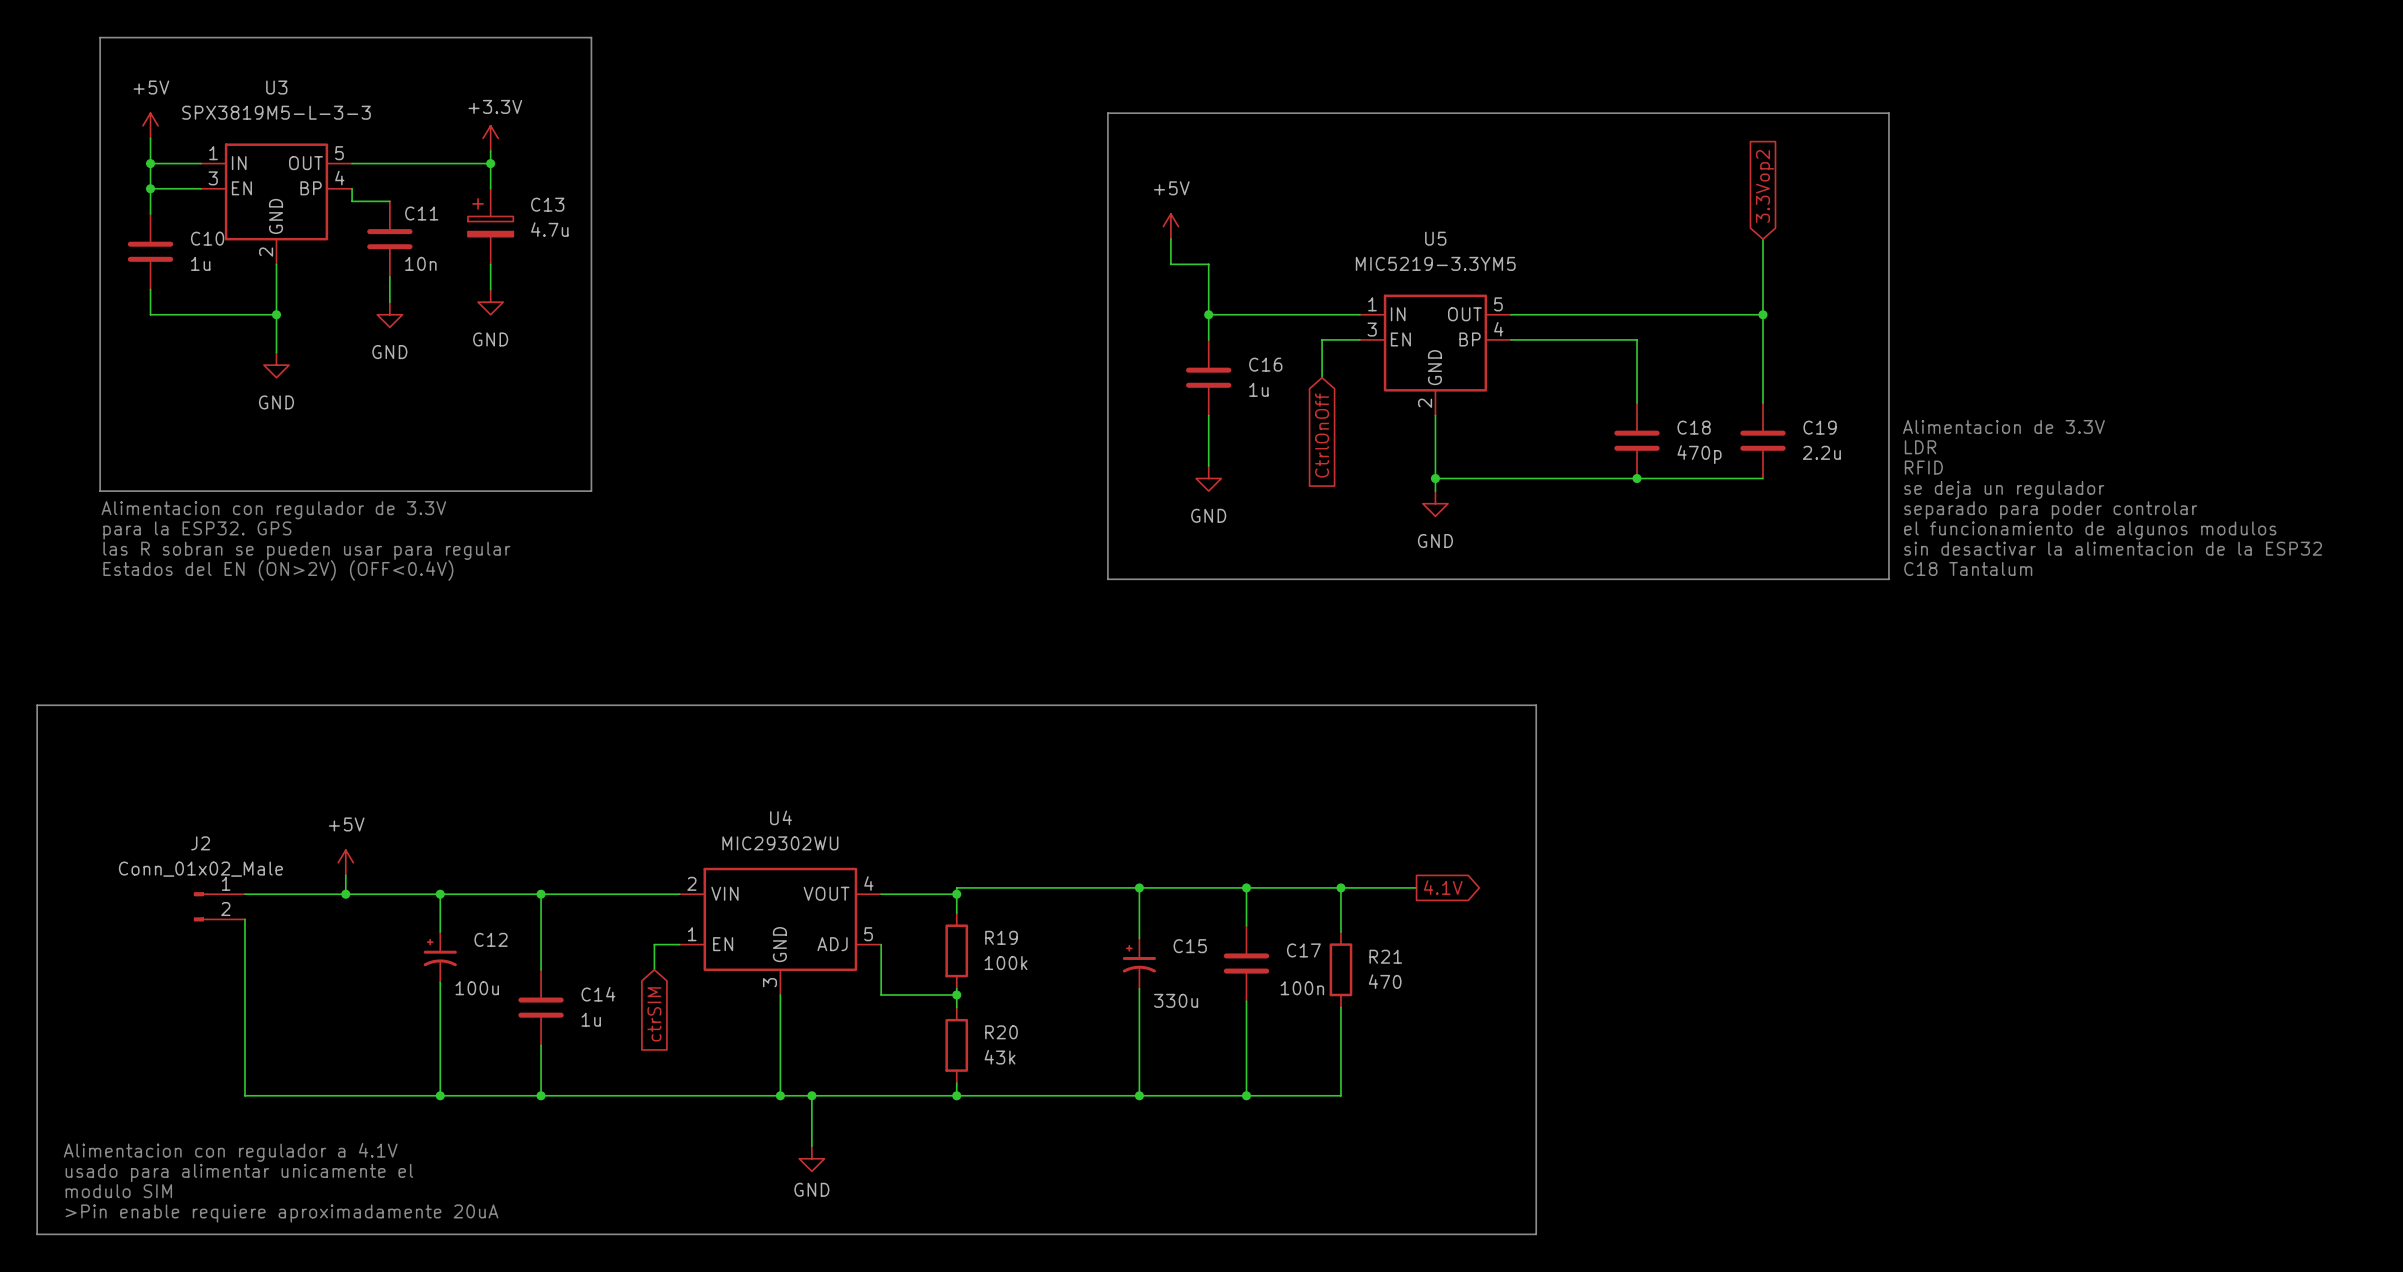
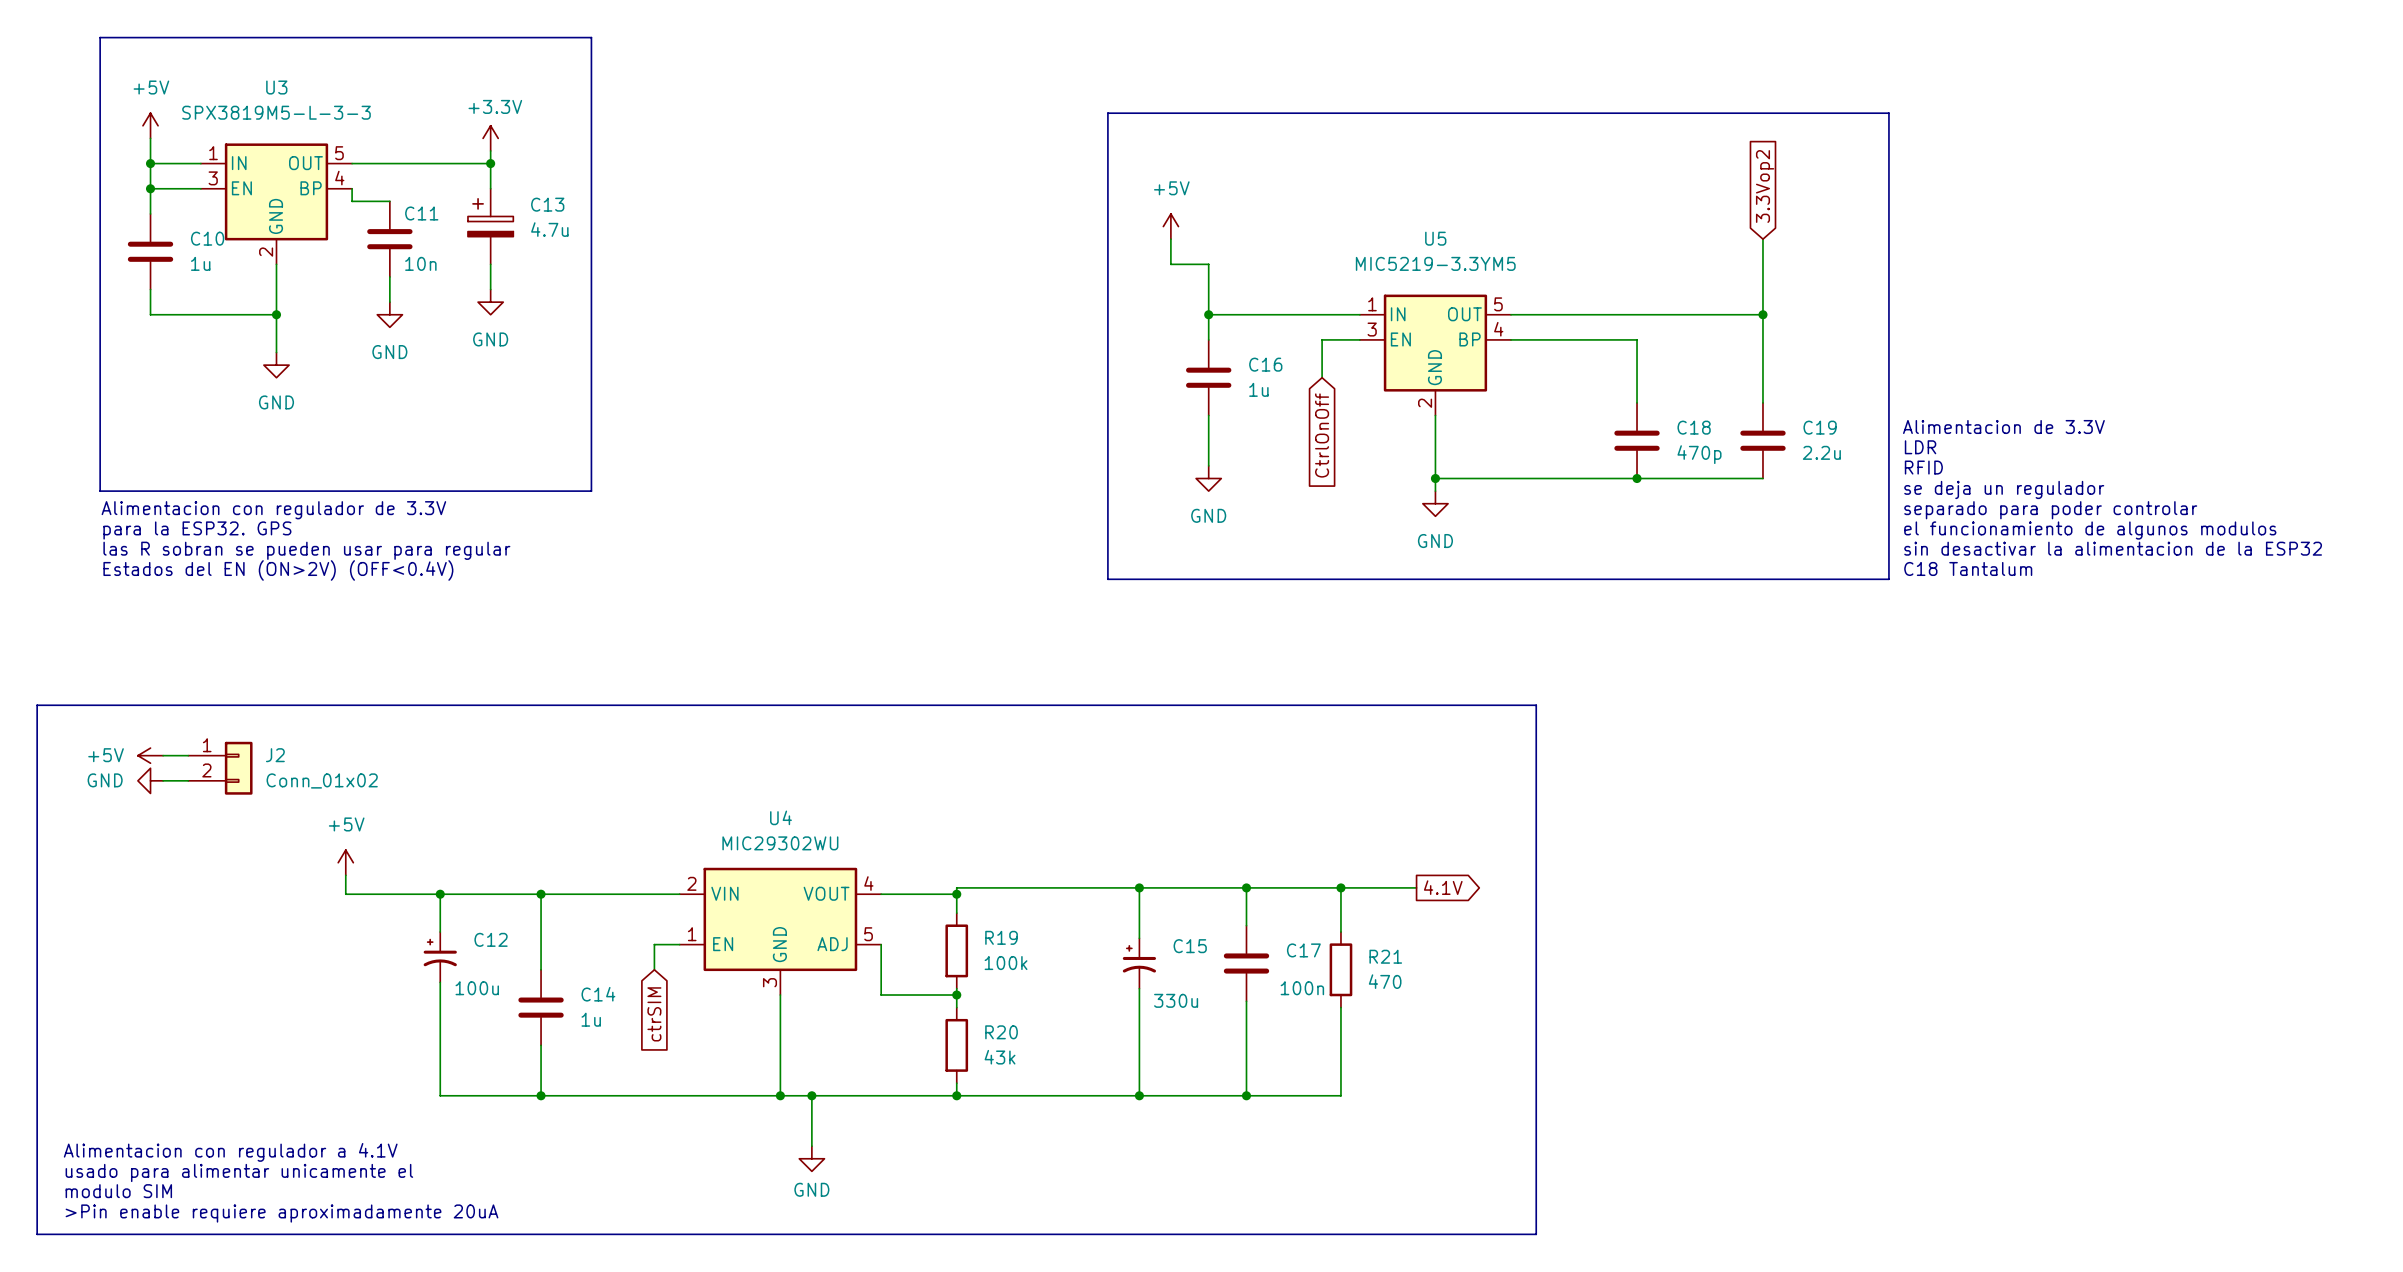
power symbol: none -> +5V (150, 755)
wire: none -> (163, 755) (188, 755)
power symbol: none -> GND (150, 780)
wire: none -> (163, 780) (188, 780)
J2 name position: J2 (200, 843) -> J2 (275, 755)
J2 value: Conn_01x02_Male (200, 869) -> Conn_01x02 (322, 780)
J2 symbol: [193, 892, 246, 922] -> [188, 741, 253, 795]
wire: (245, 894) (345, 894) -> none
junction: (345, 894) -> none
wire: (245, 919) (245, 1095) (440, 1095) -> none
junction: (440, 1095) -> none

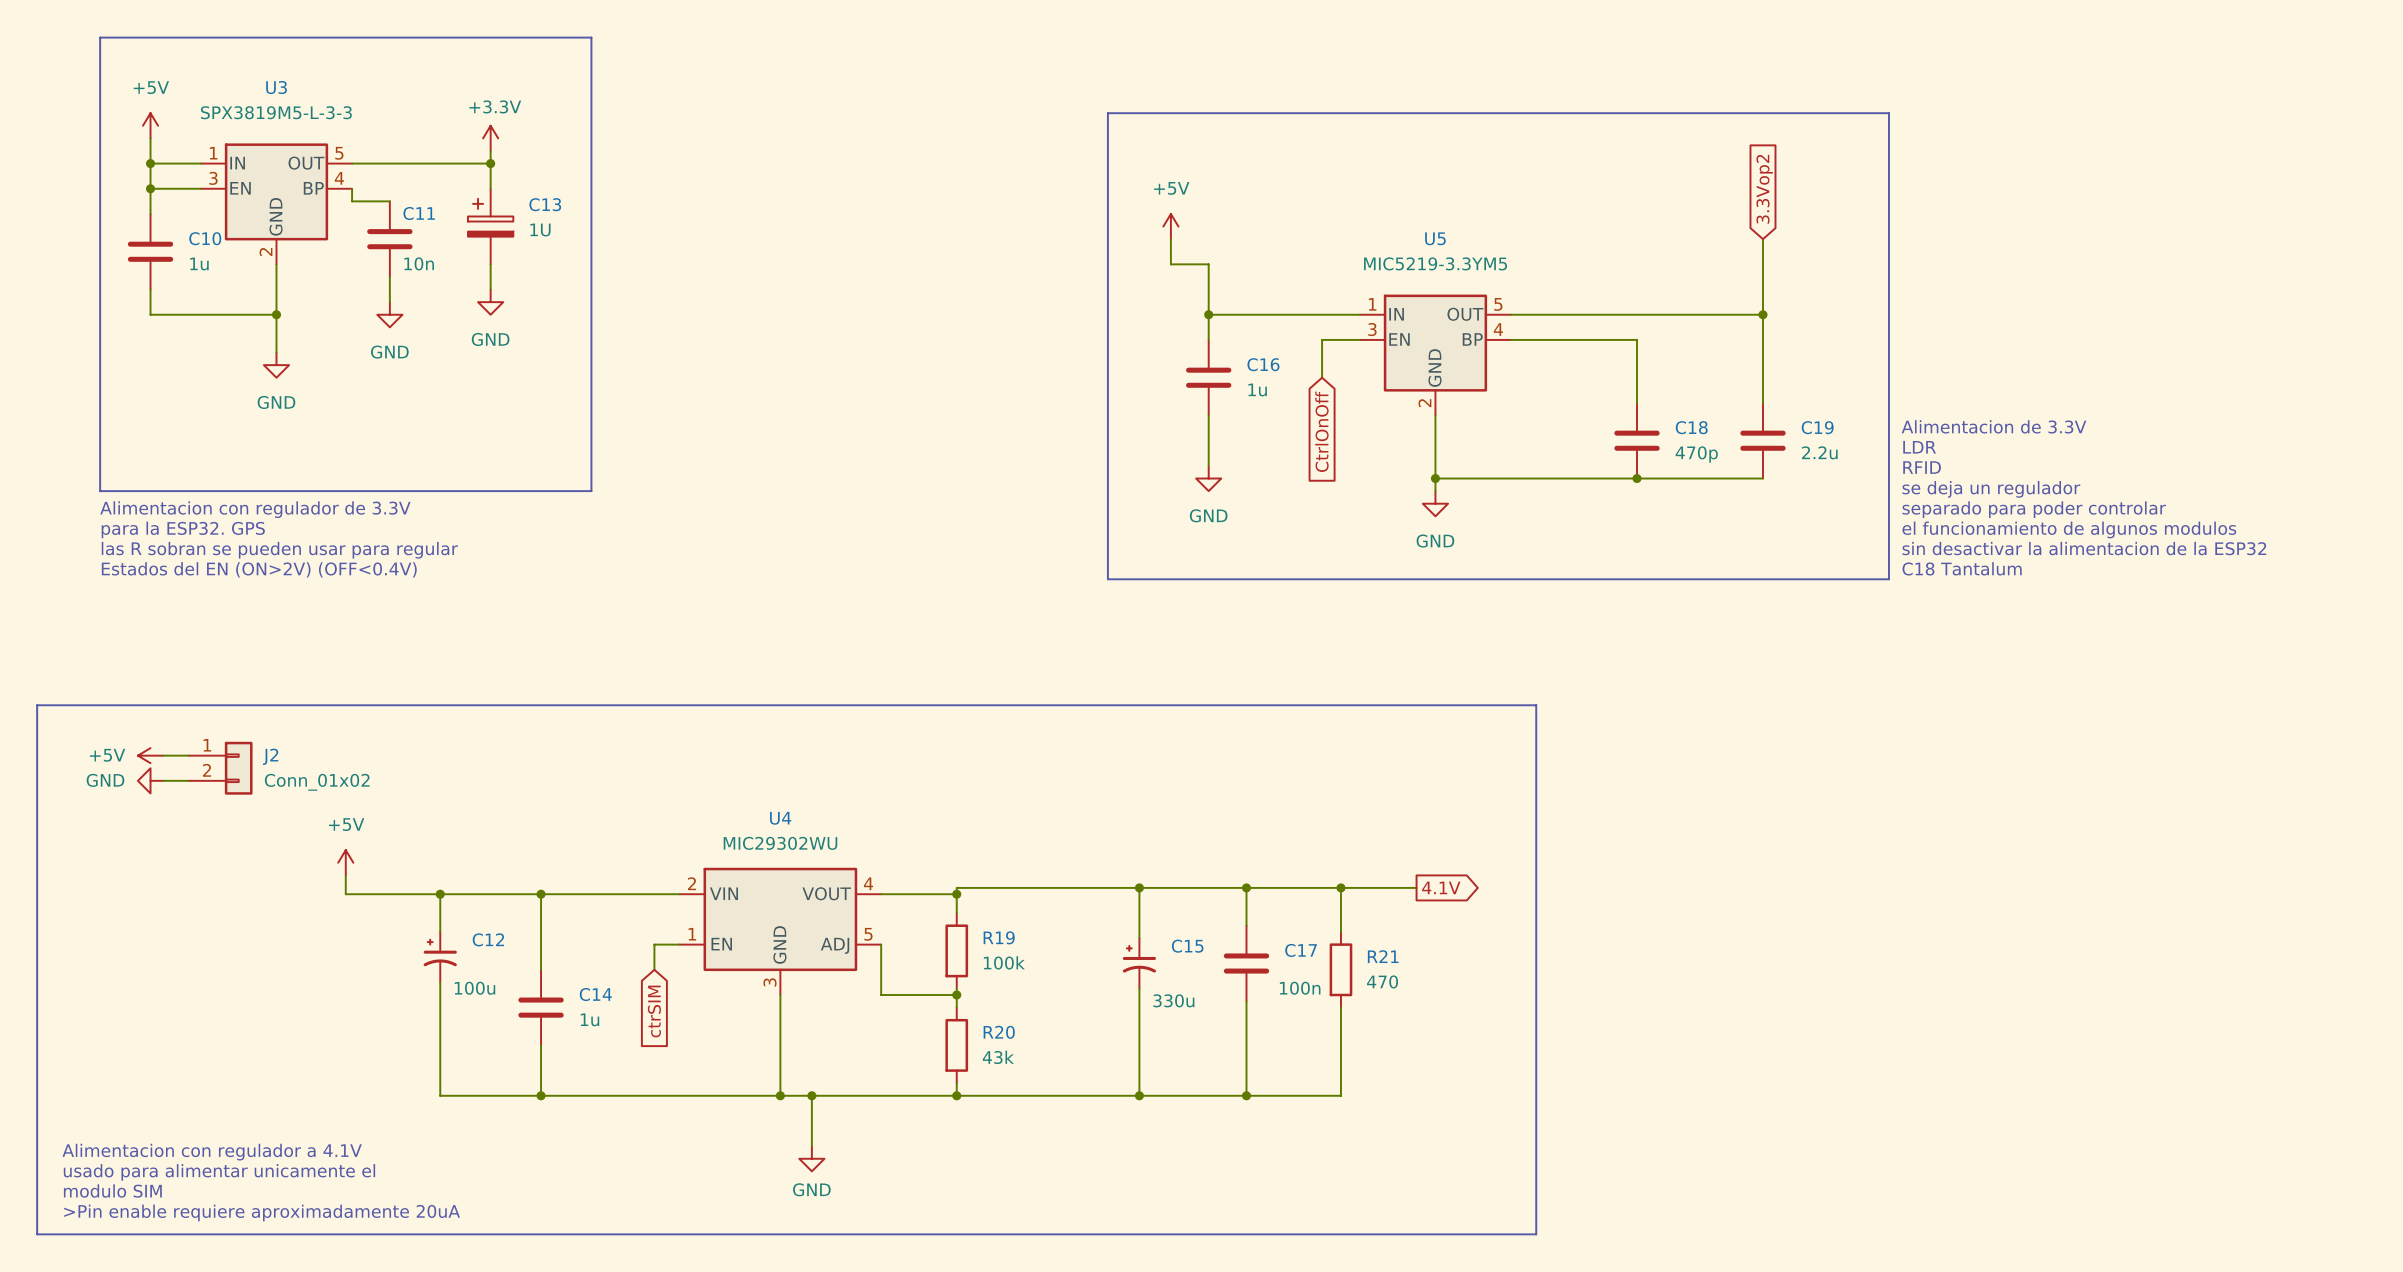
C13 value: 4.7u (549, 229) -> 1U (540, 229)

